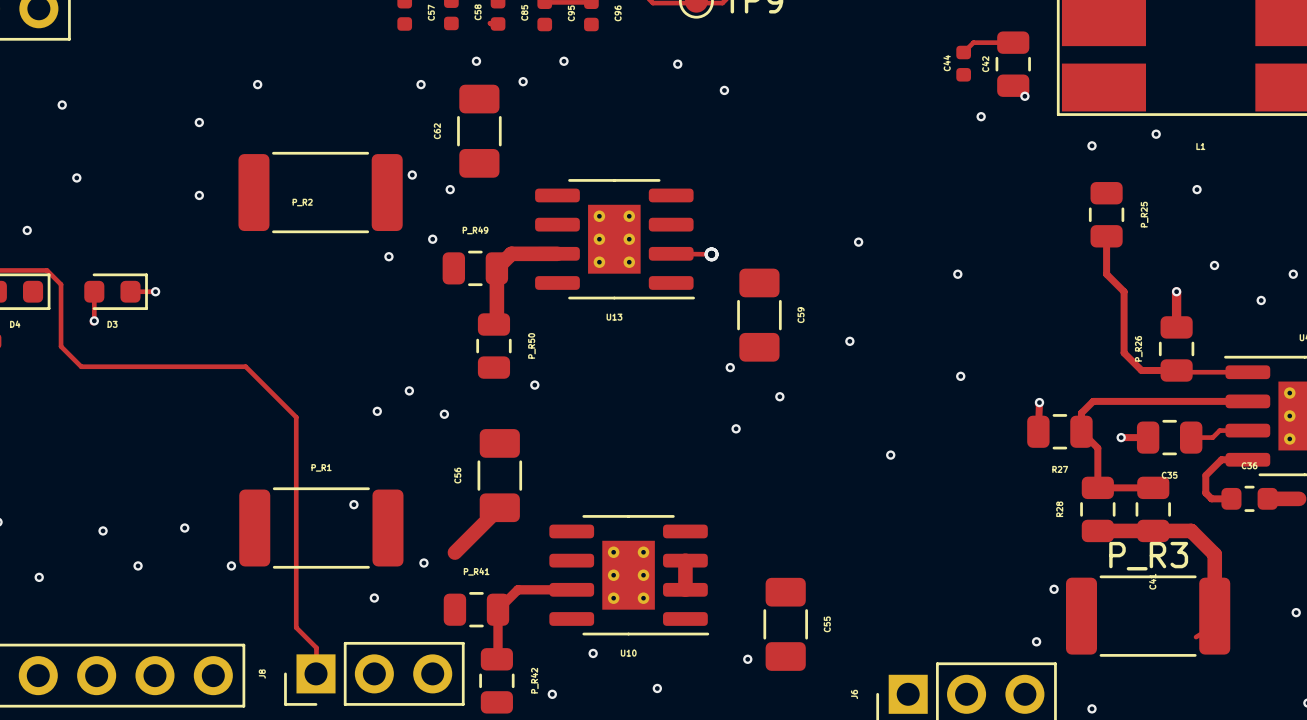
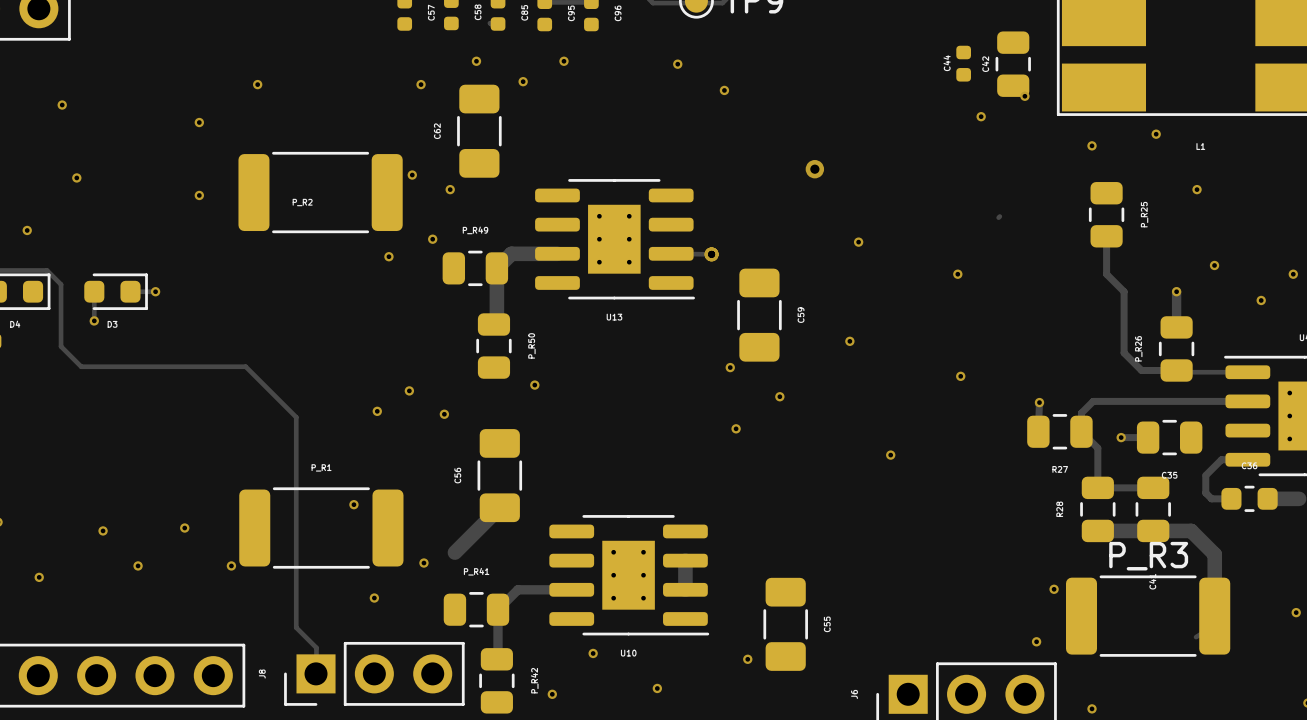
track: (1013, 42) (973, 42) (963, 52) -> none
via: none -> (814, 169)
track: none -> (999, 216) (998, 217)
track: (1247, 430) (1219, 430) (1212, 437) (1191, 437) -> none

